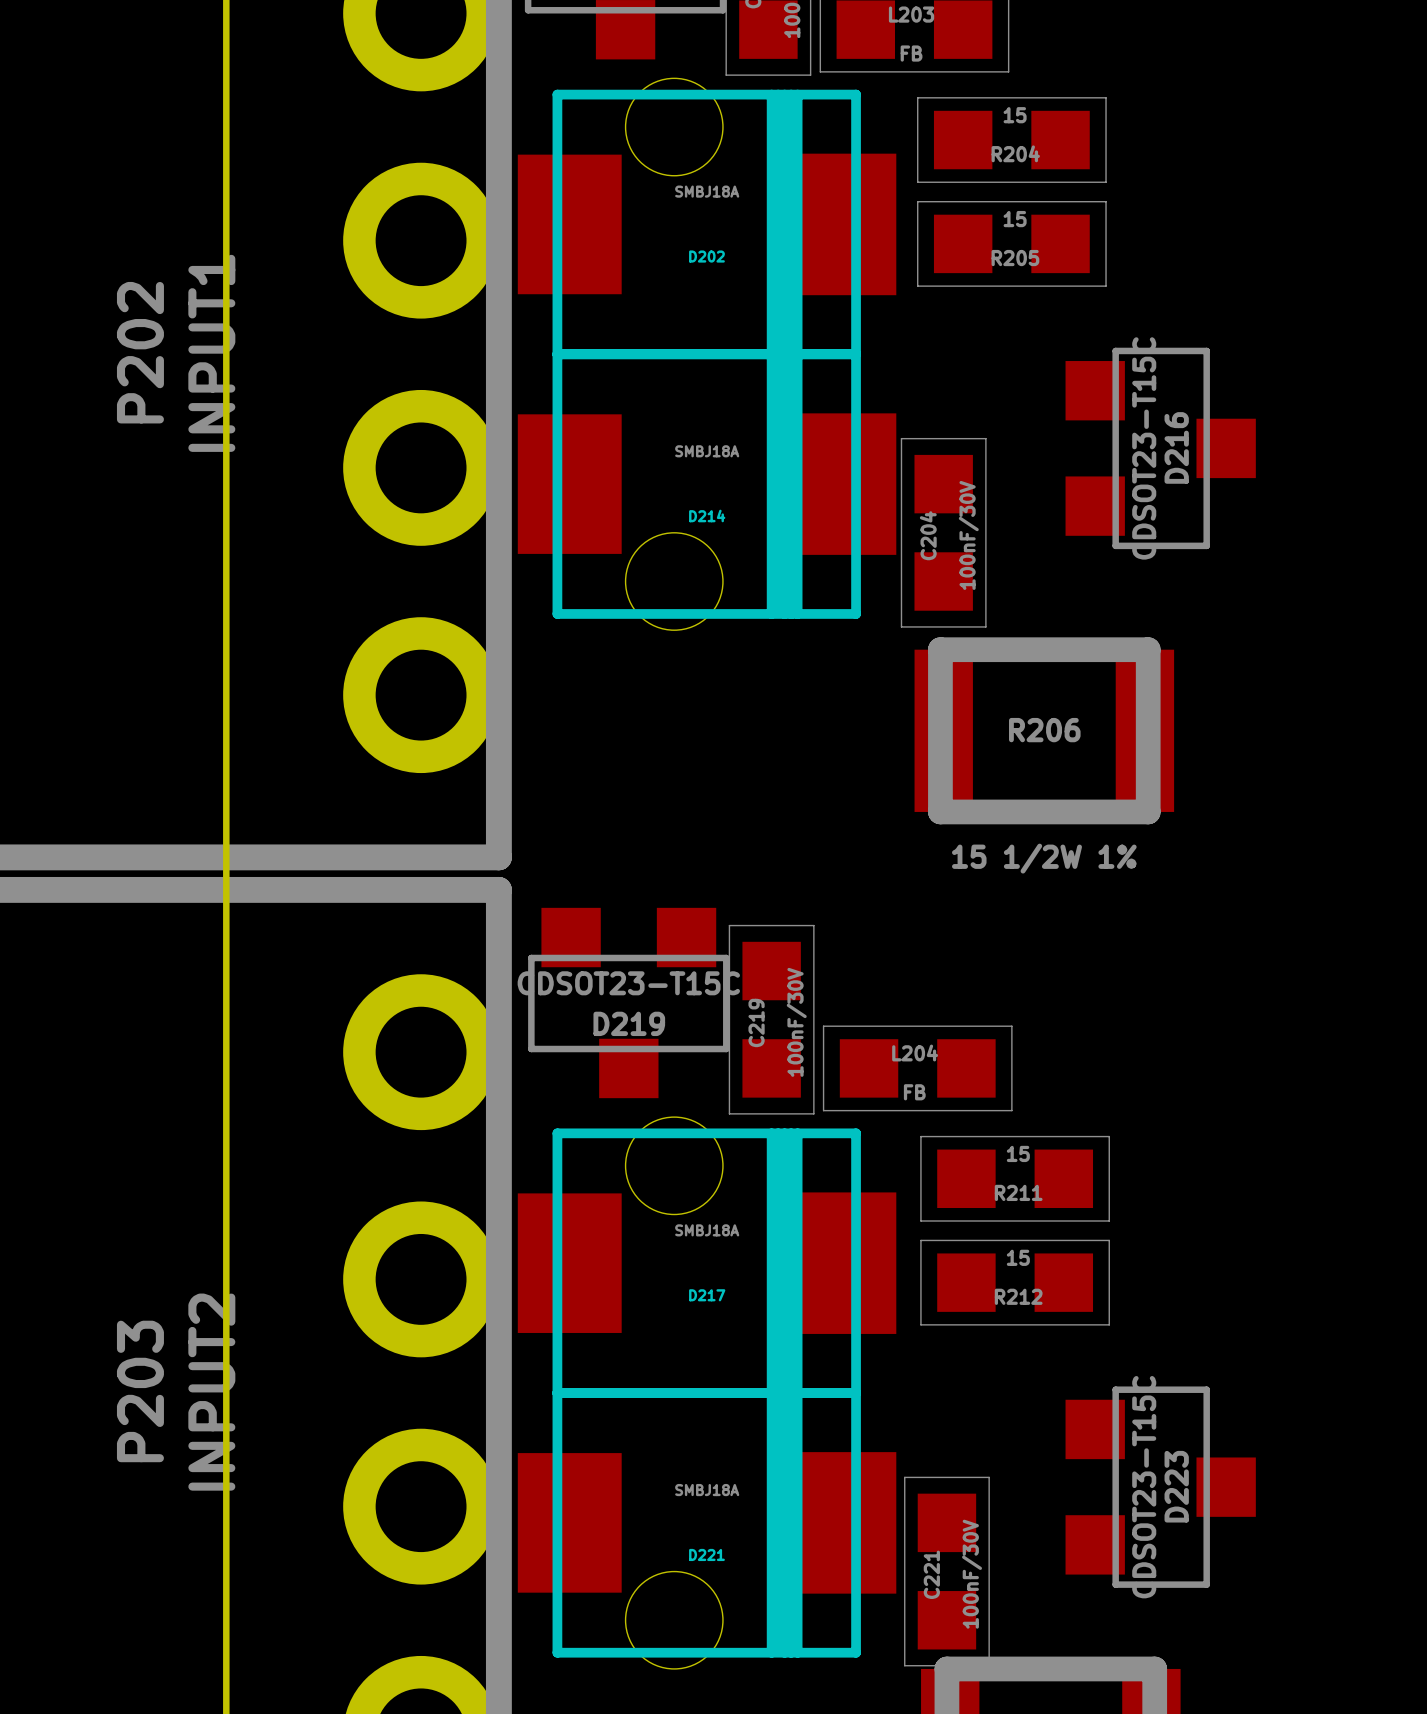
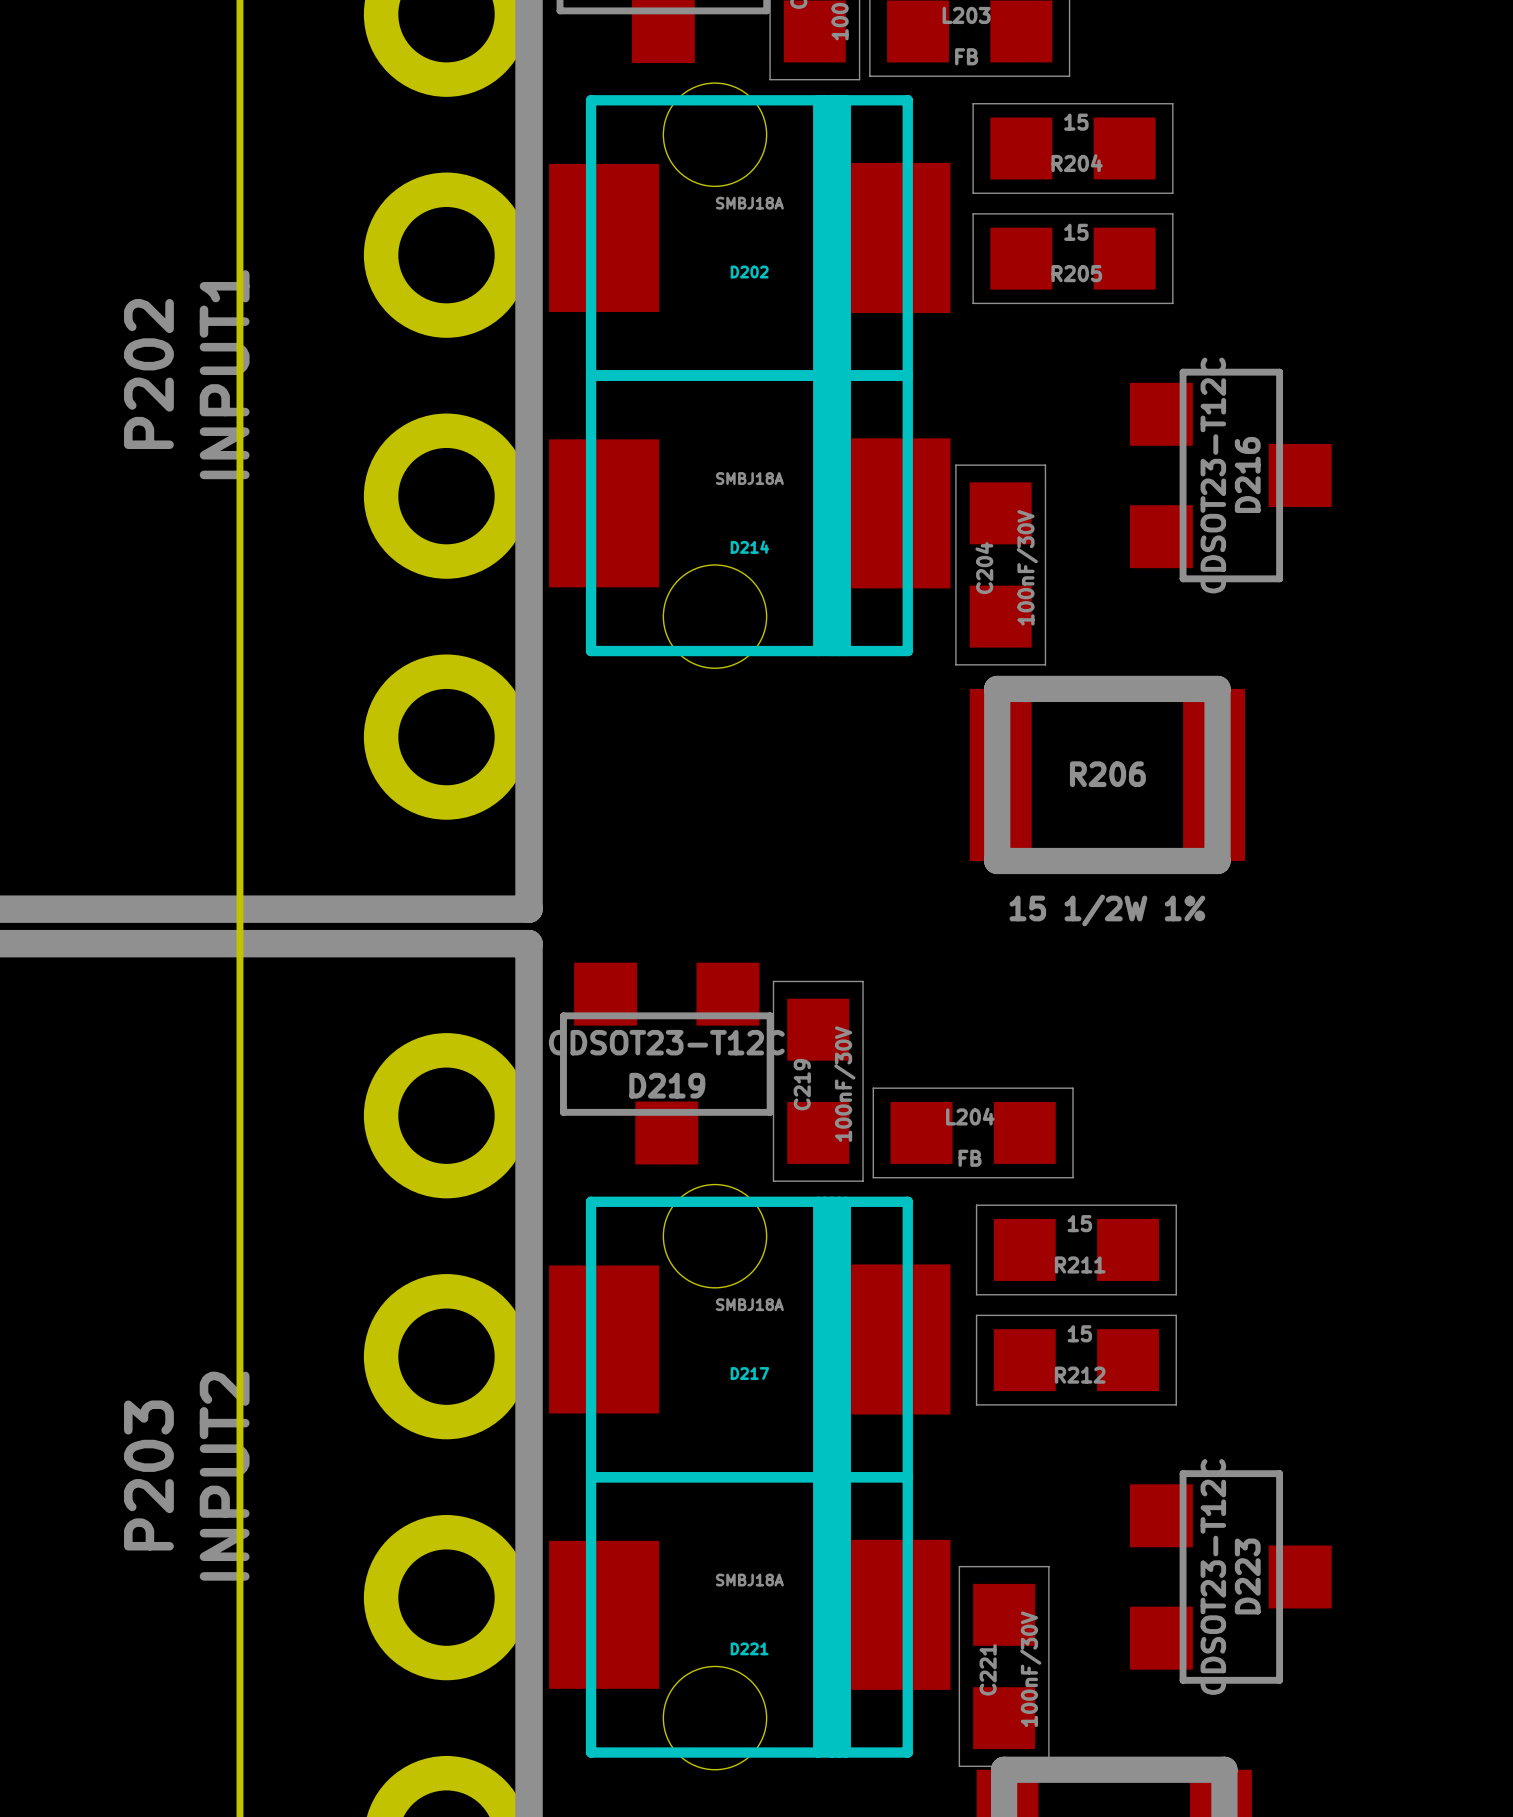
D216 value: CDSOT23-T15C (1144, 448) -> CDSOT23-T12C (1213, 475)
D219 value: CDSOT23-T15C (628, 983) -> CDSOT23-T12C (666, 1042)
D223 value: CDSOT23-T15C (1144, 1487) -> CDSOT23-T12C (1213, 1576)

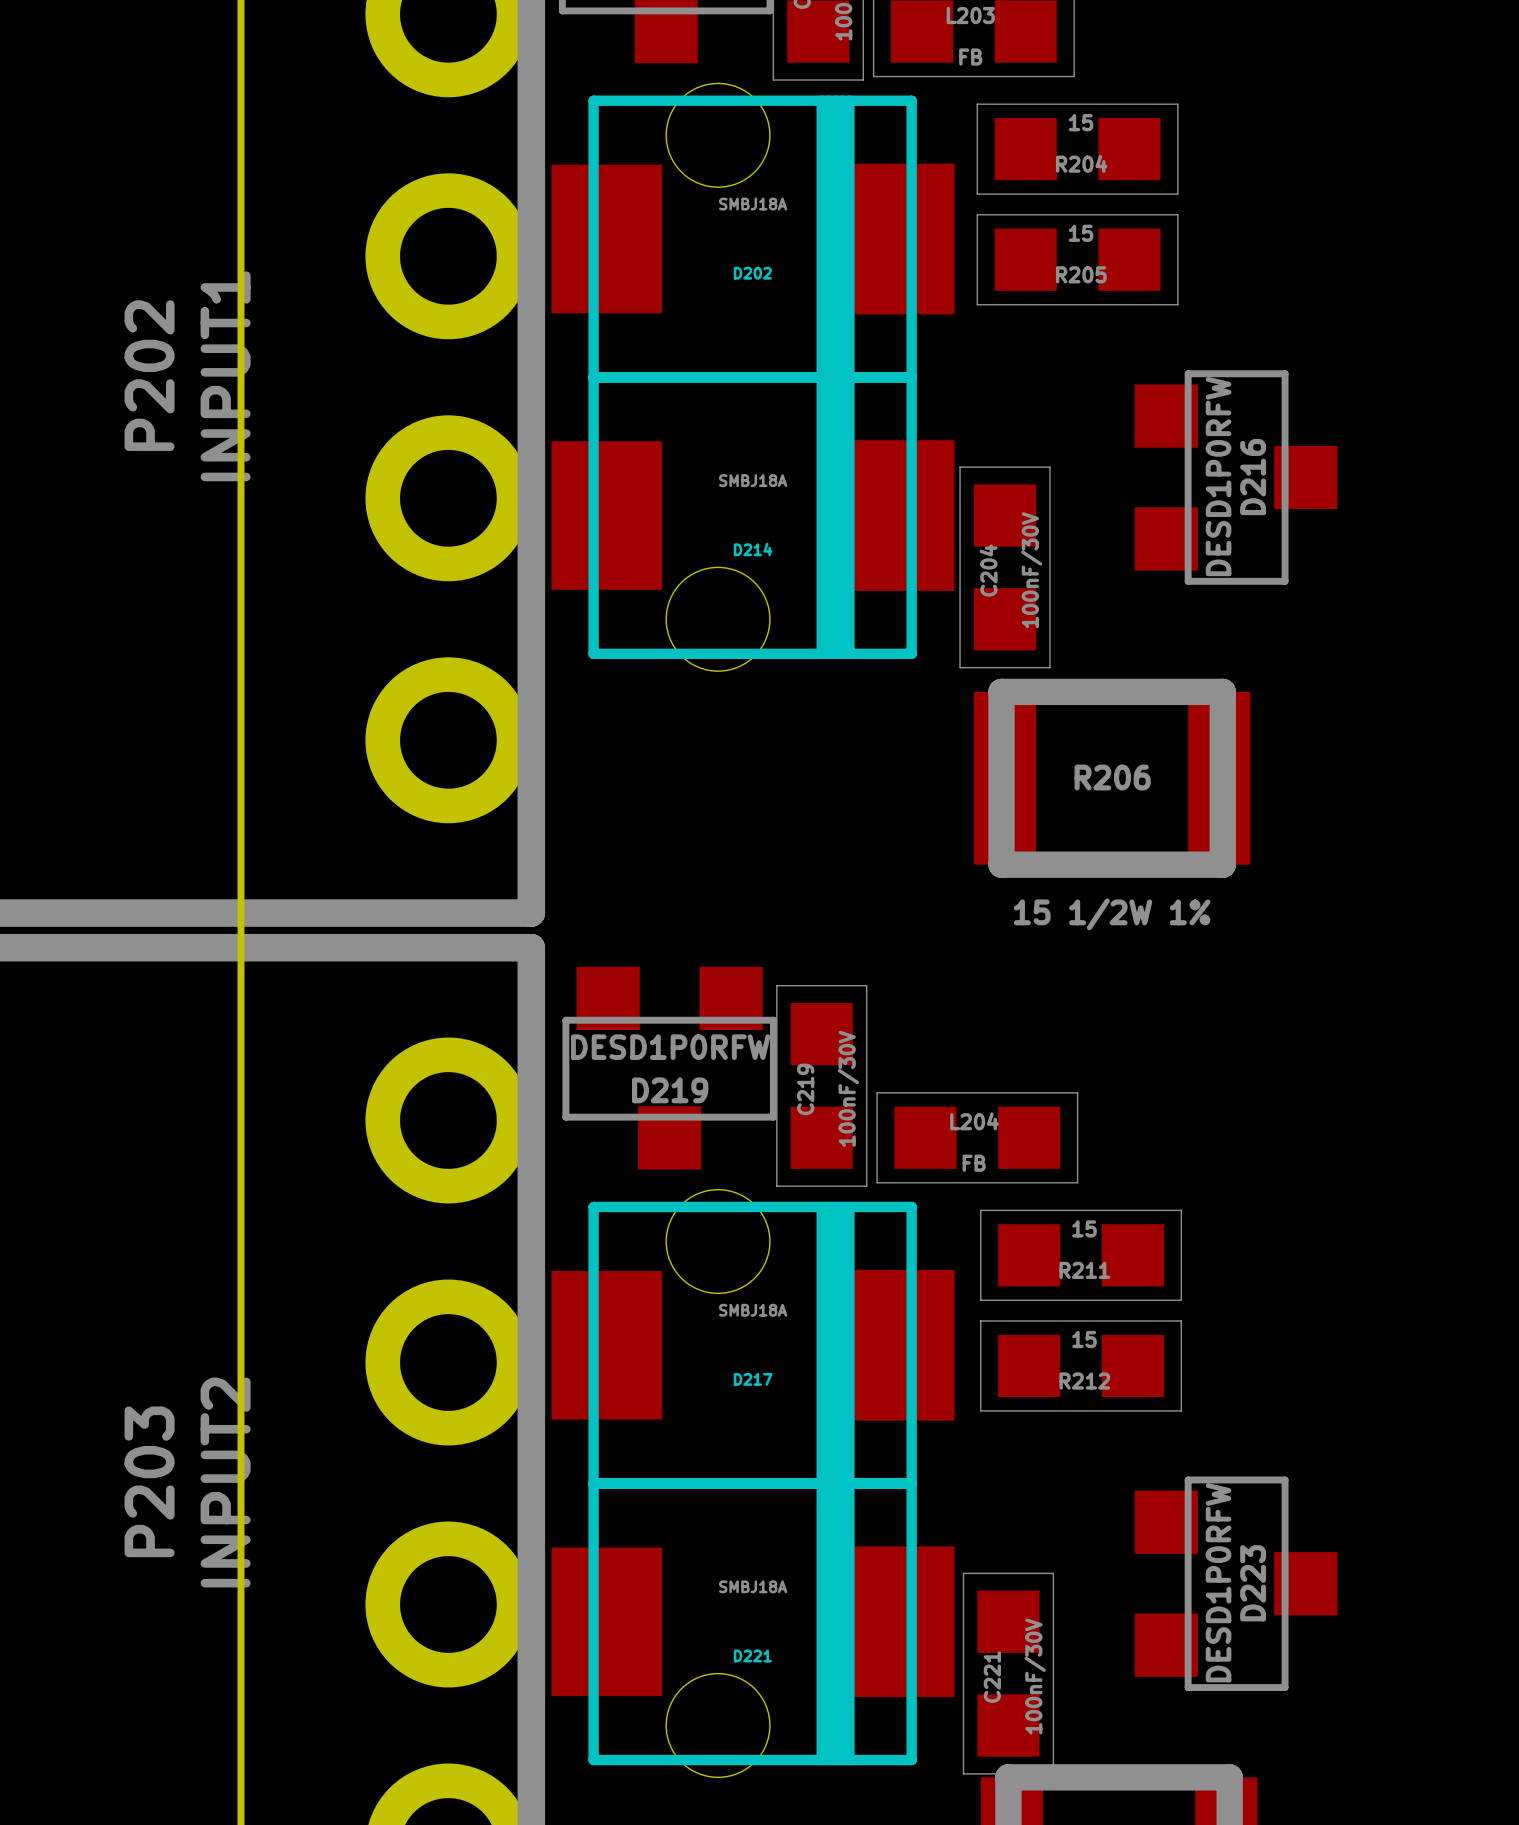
D216 value: CDSOT23-T12C (1213, 475) -> DESD1P0RFW (1218, 476)
D219 value: CDSOT23-T12C (666, 1042) -> DESD1P0RFW (670, 1047)
D223 value: CDSOT23-T12C (1213, 1576) -> DESD1P0RFW (1218, 1582)

